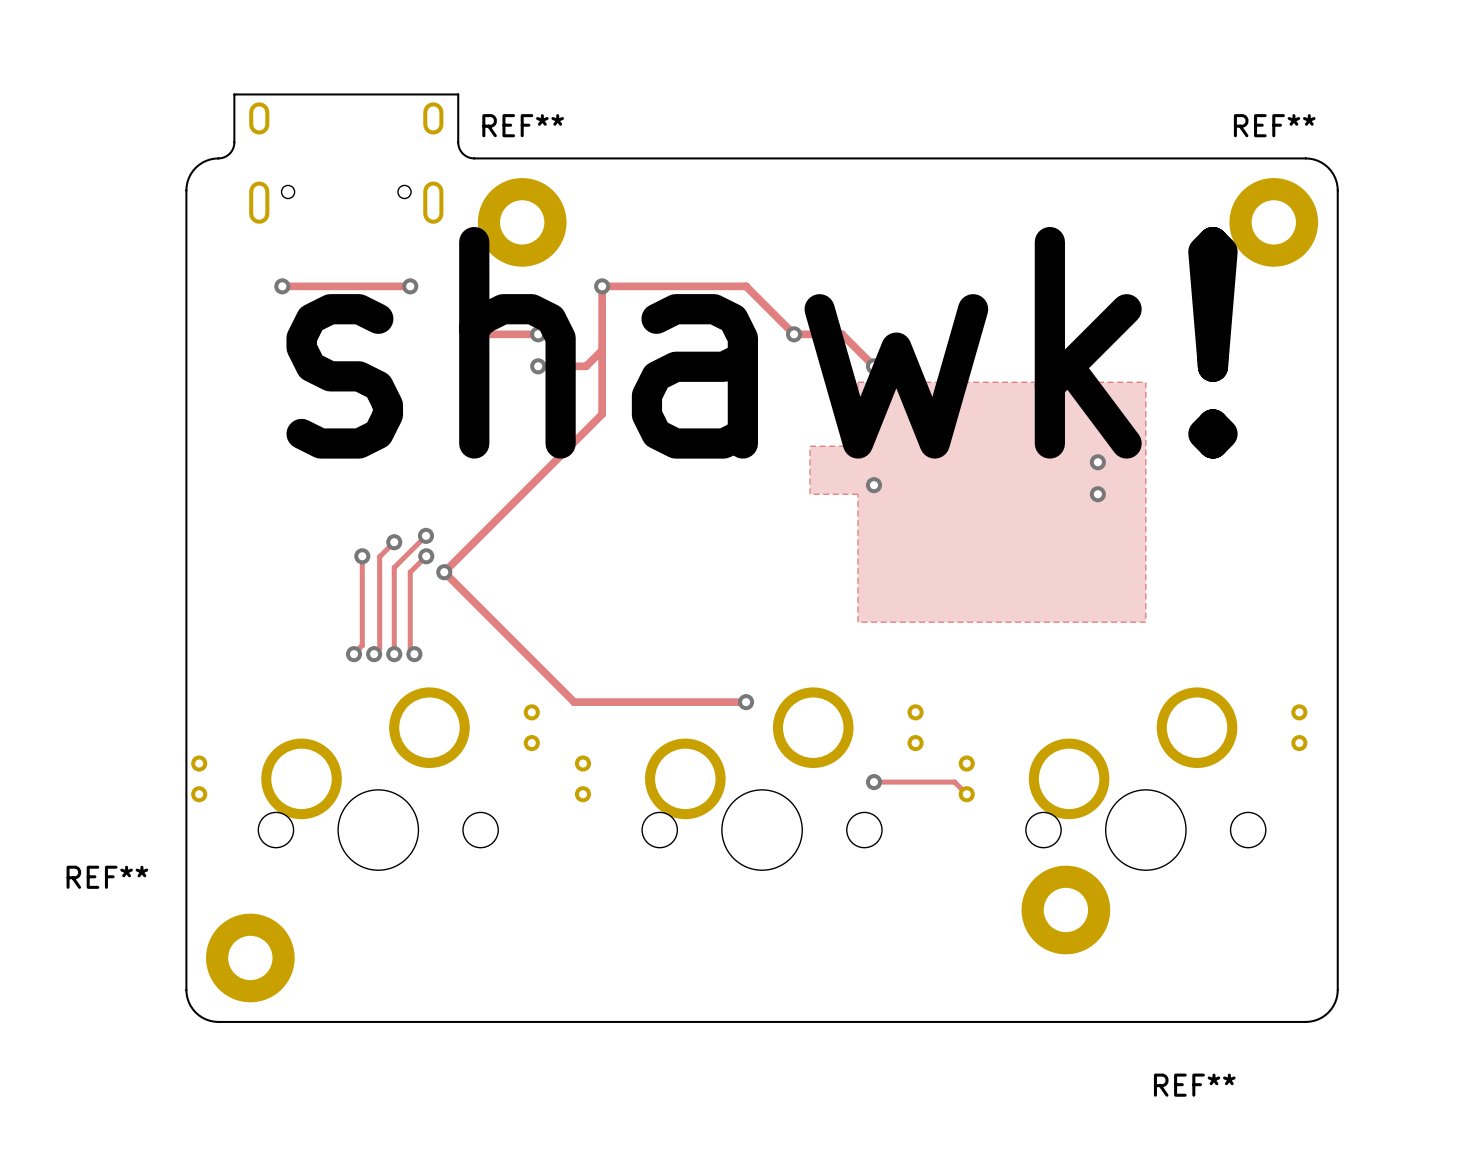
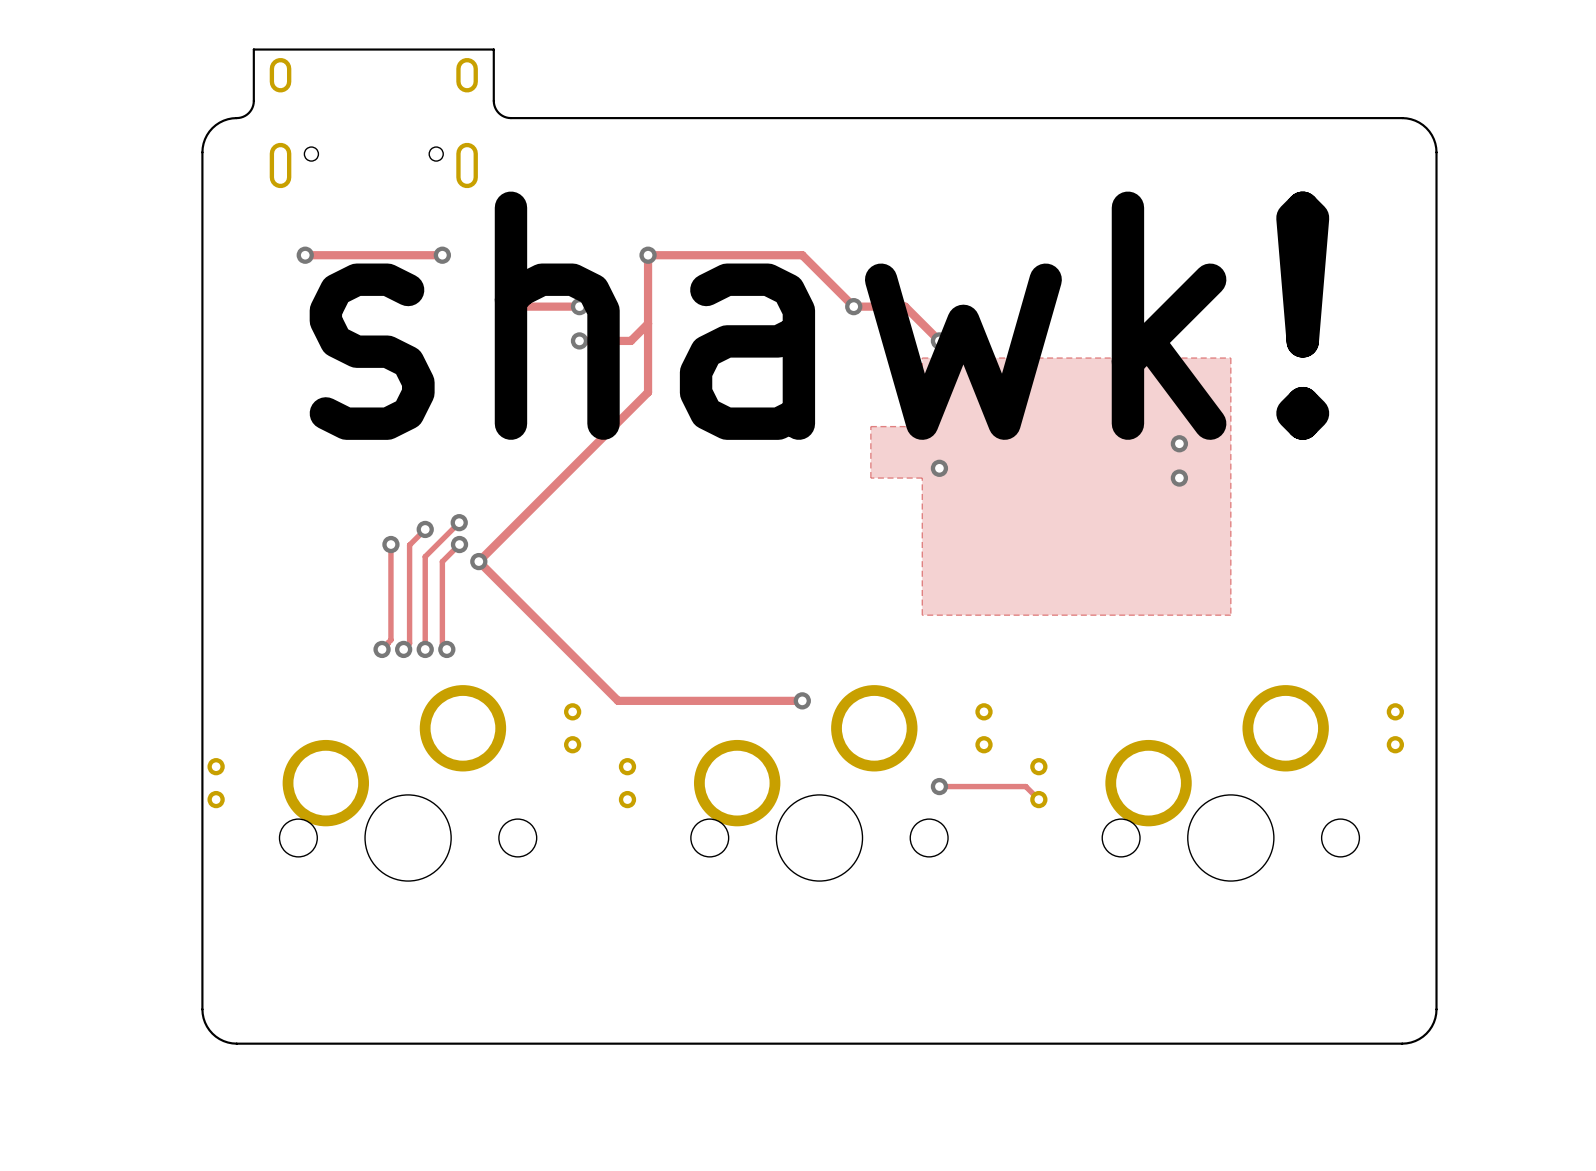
REF**: (522, 222) -> none
REF**: (1273, 222) -> none
REF**: (1065, 910) -> none
REF**: (250, 957) -> none

